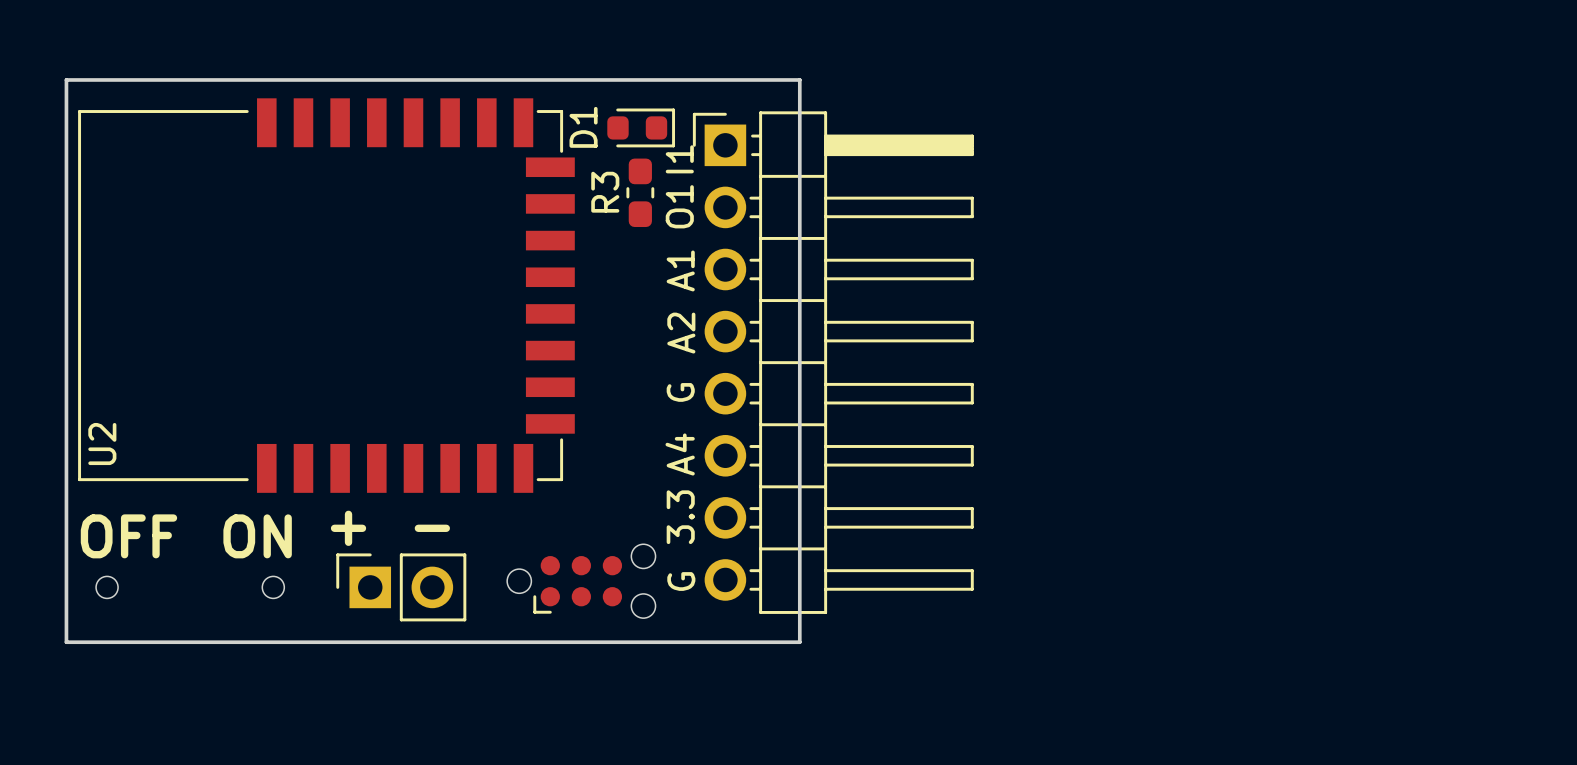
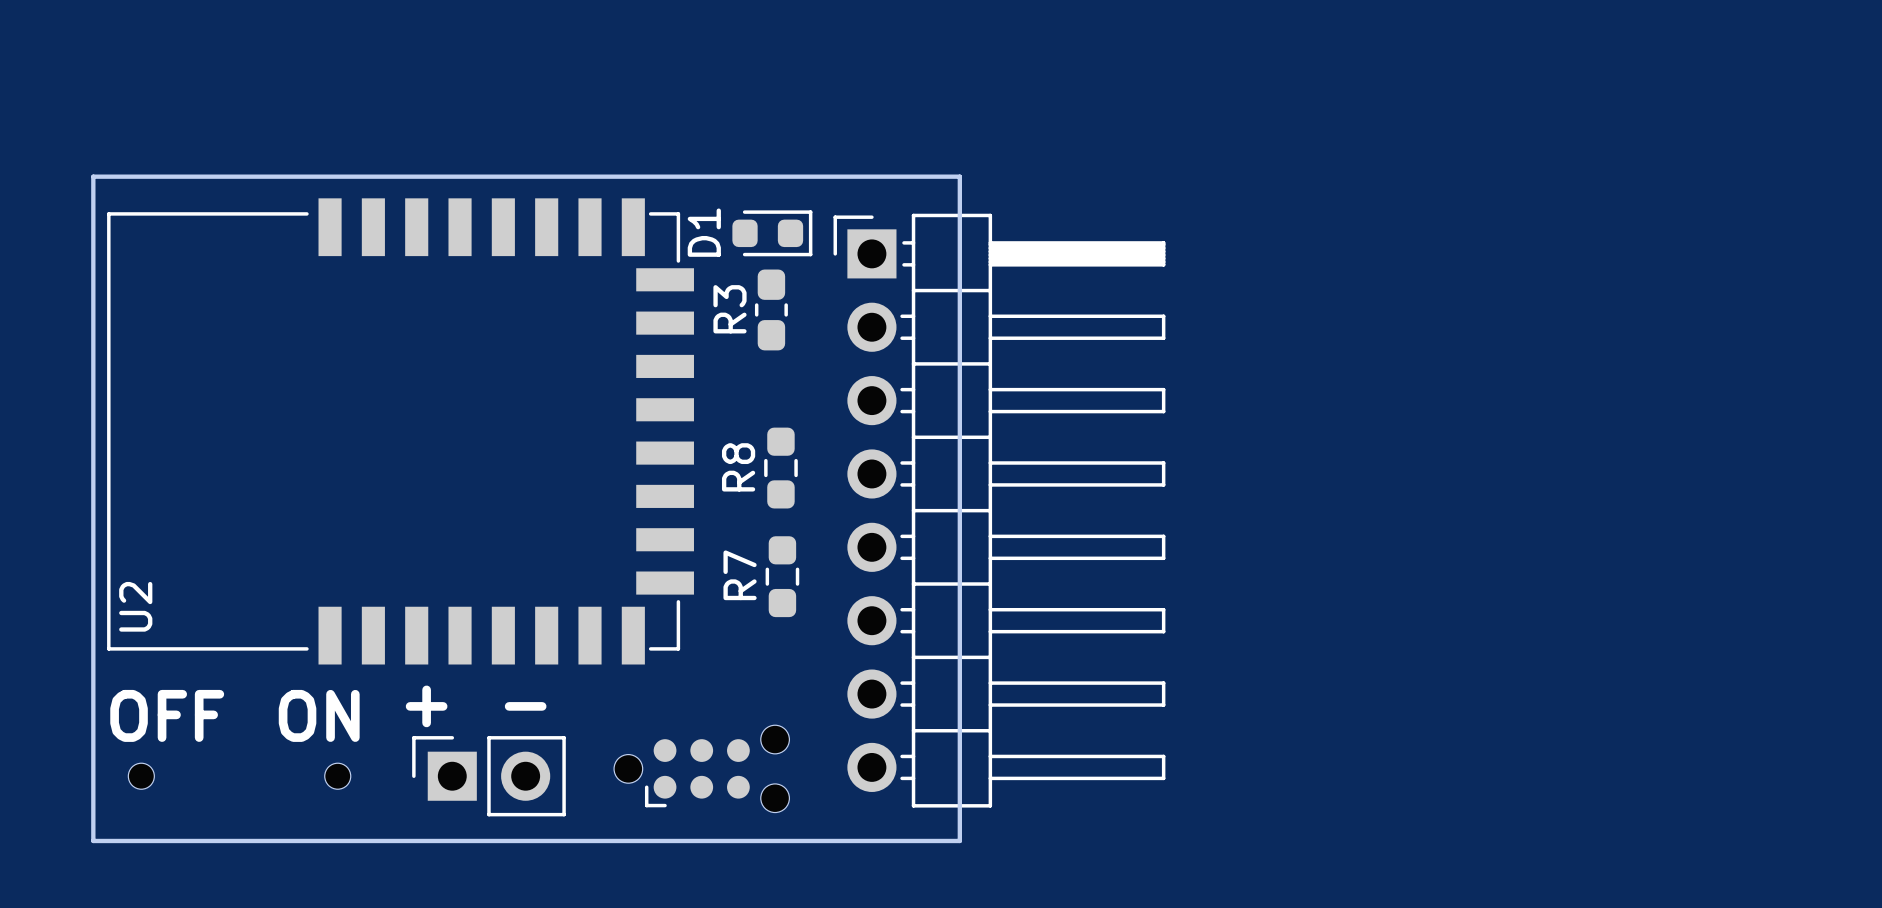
text: I1 (679, 159) -> none
text: O1 (679, 206) -> none
text: A1 (680, 270) -> none
R8: none -> (780, 468)
text: A2 (681, 333) -> none
text: G (680, 392) -> none
R7: none -> (782, 576)
text: A4 (680, 454) -> none
text: 3.3 (680, 517) -> none
text: G (681, 581) -> none

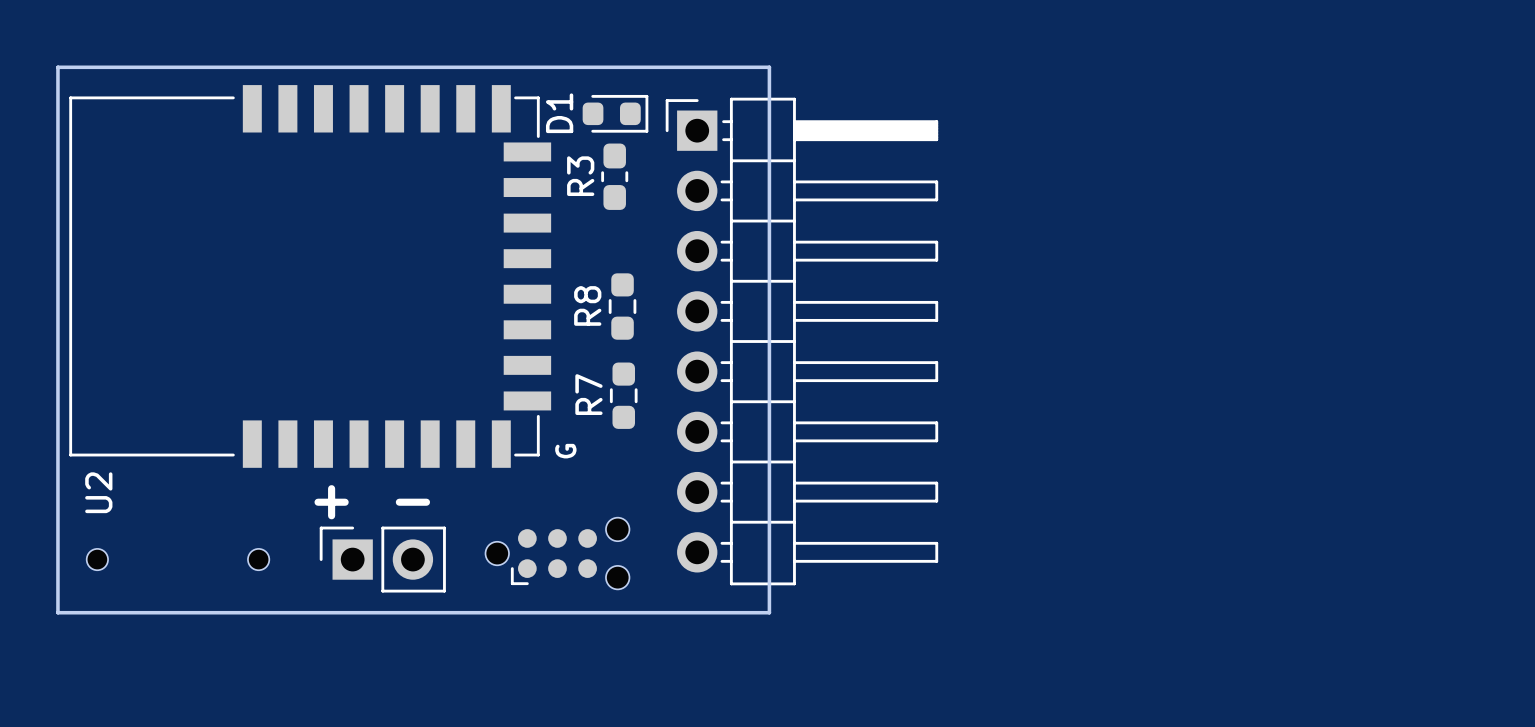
U2 name position: U2 (135, 606) -> U2 (98, 492)
text: none -> G (565, 451)
text: OFF (167, 715) -> none
text: ON (319, 715) -> none

